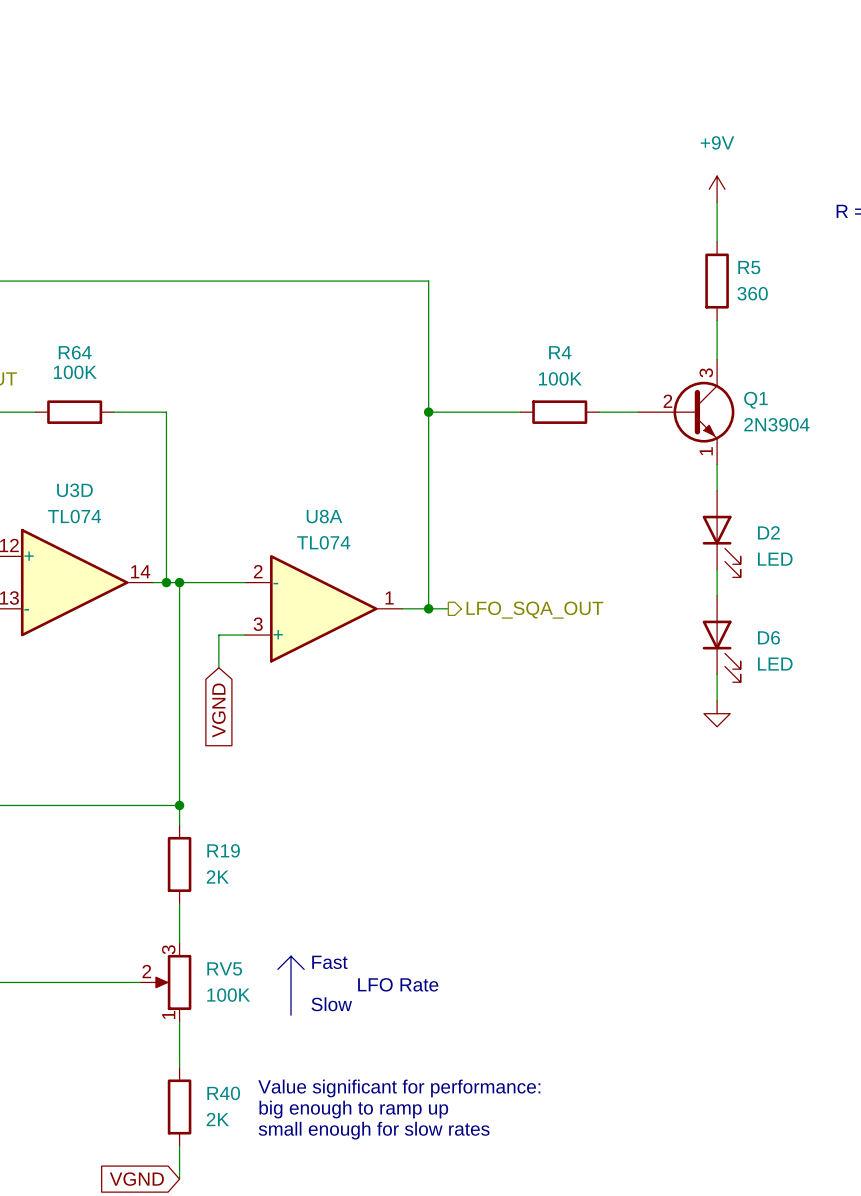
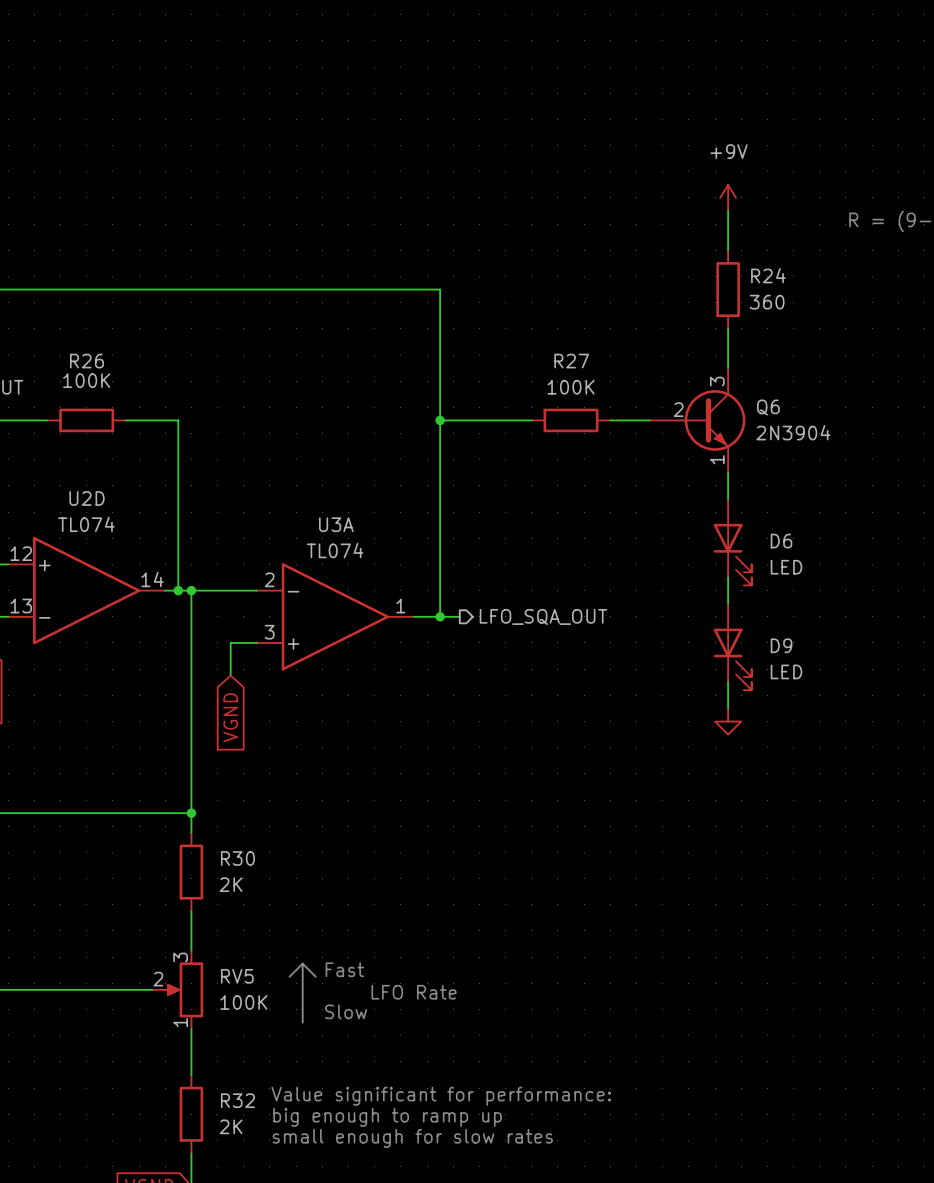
R5 name: R5 (749, 267) -> R24 (768, 275)
R64 name: R64 (75, 352) -> R26 (87, 361)
R4 name: R4 (560, 352) -> R27 (571, 361)
Q1 name: Q1 (755, 400) -> Q6 (768, 407)
U3D name: U3D (74, 490) -> U2D (87, 498)
U8A name: U8A (324, 516) -> U3A (336, 524)
D2 name: D2 (768, 532) -> D6 (781, 541)
D6 name: D6 (768, 637) -> D9 (781, 645)
R19 name: R19 (223, 850) -> R30 (237, 858)
R40 name: R40 (223, 1093) -> R32 (237, 1100)

